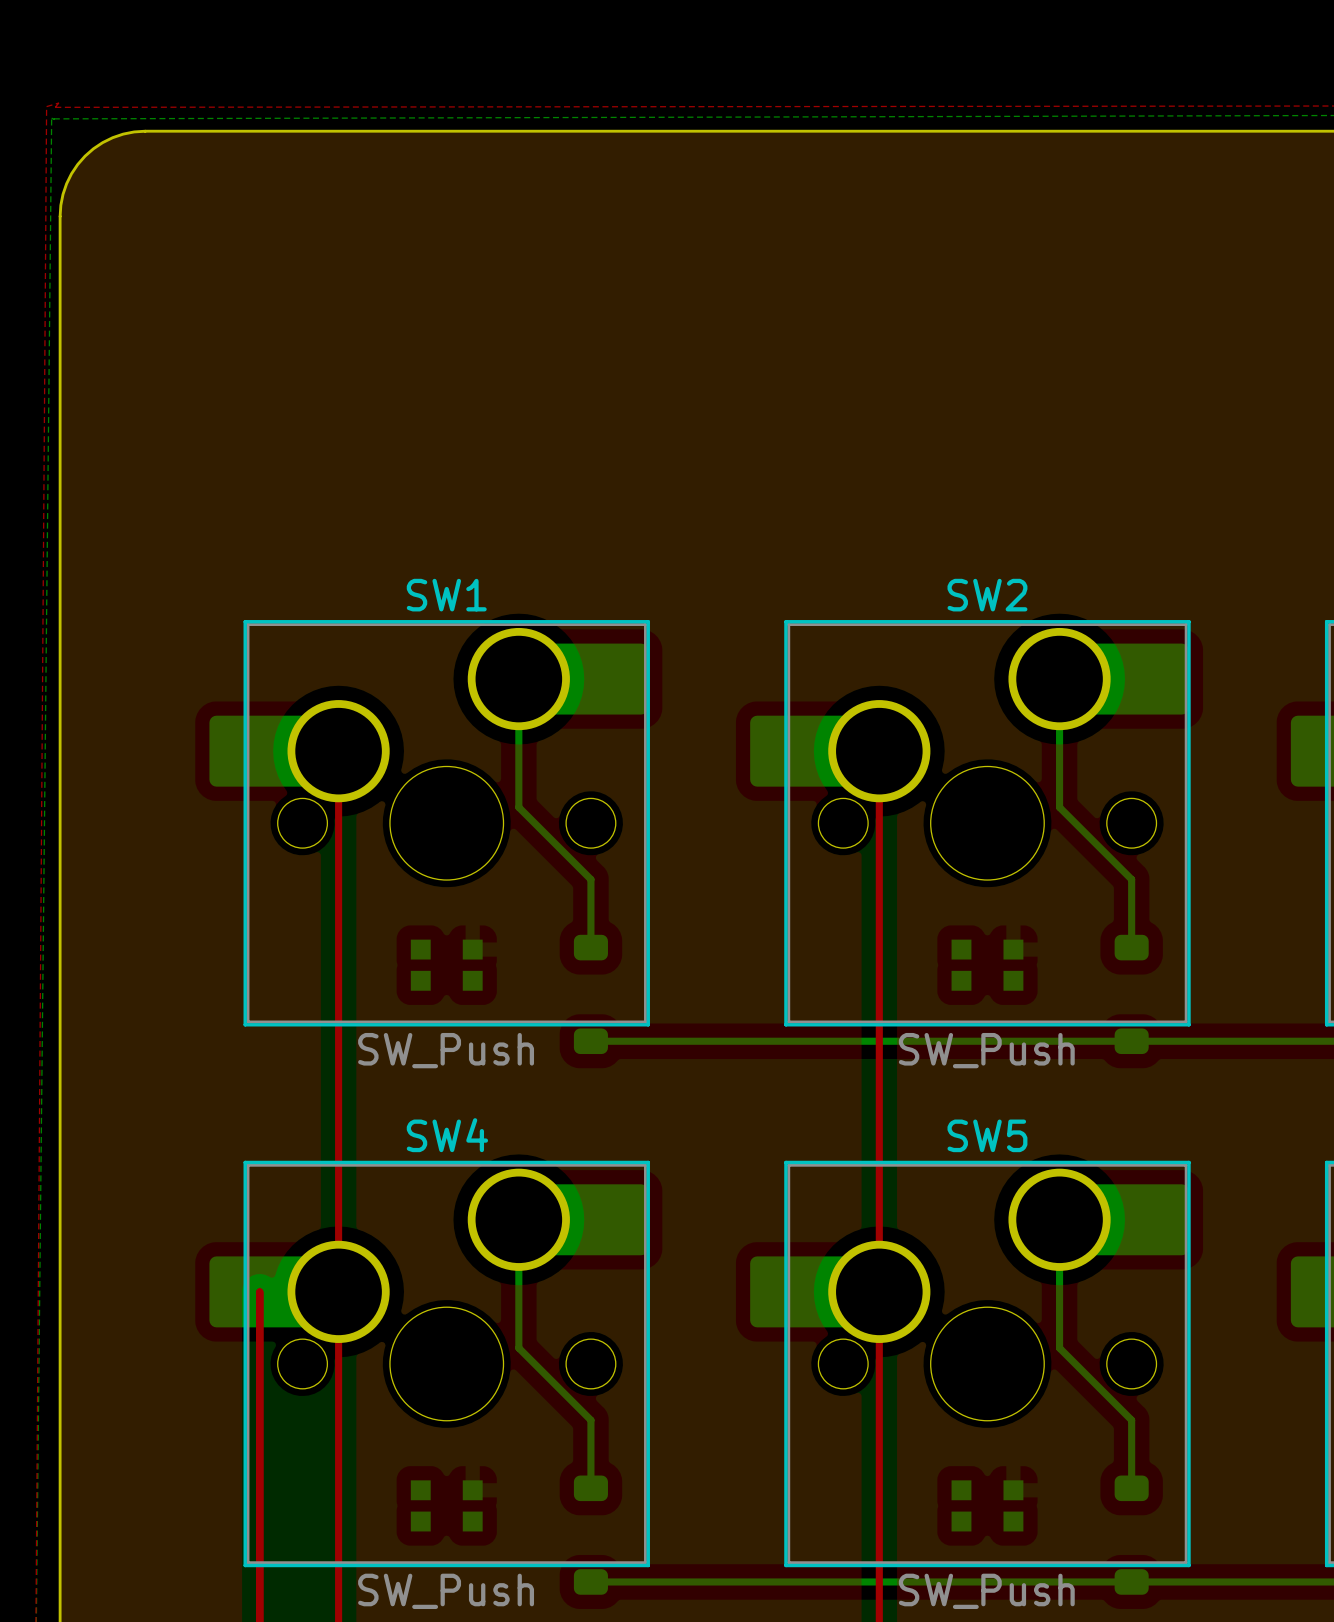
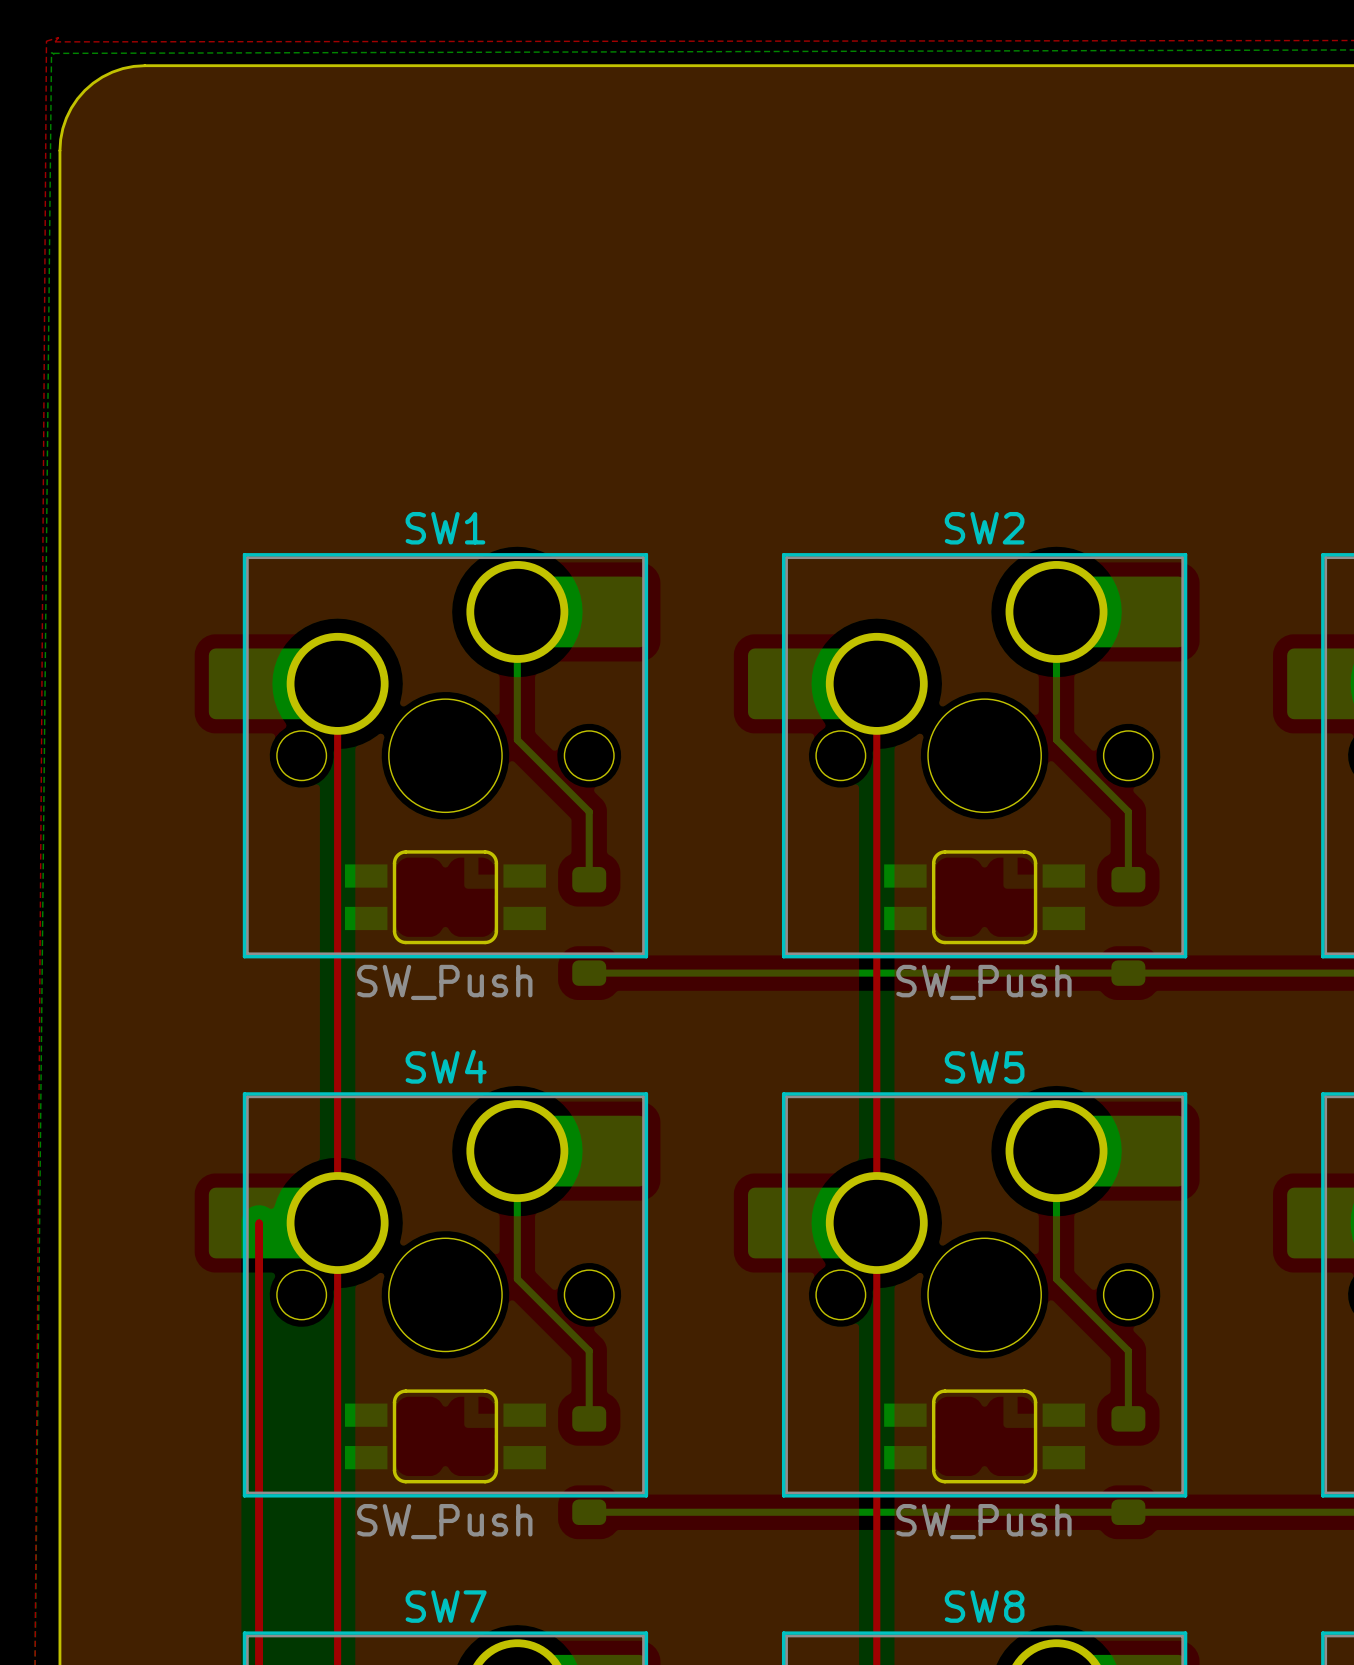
part footprint: [410, 939, 483, 991] -> [344, 850, 546, 945]
part footprint: [951, 939, 1024, 991] -> [884, 850, 1086, 945]
part footprint: [410, 1480, 483, 1532] -> [344, 1389, 546, 1484]
part footprint: [951, 1480, 1024, 1532] -> [884, 1389, 1086, 1484]

